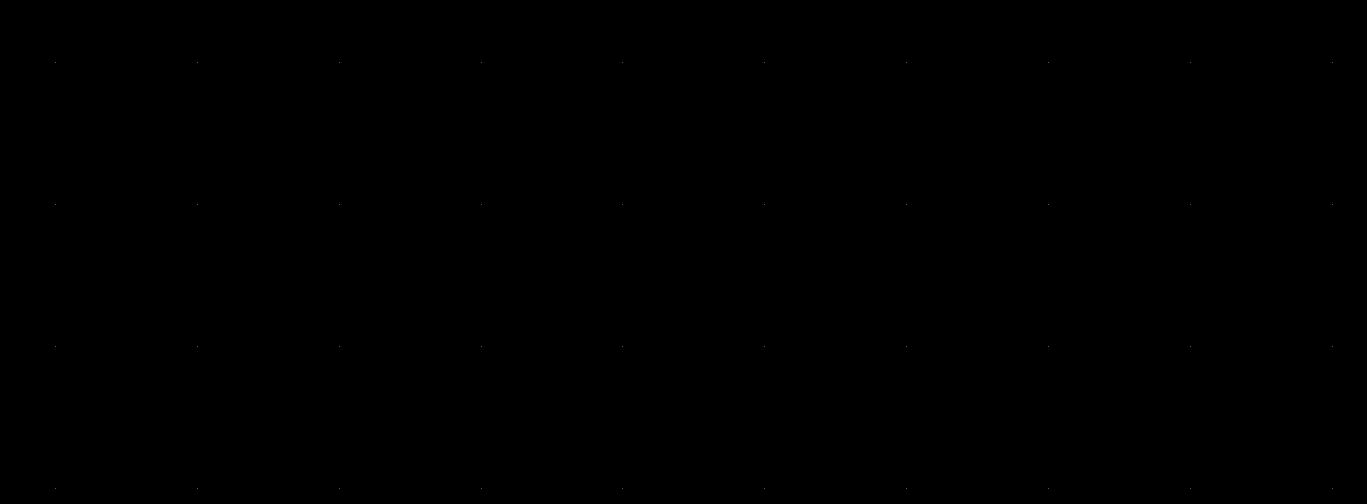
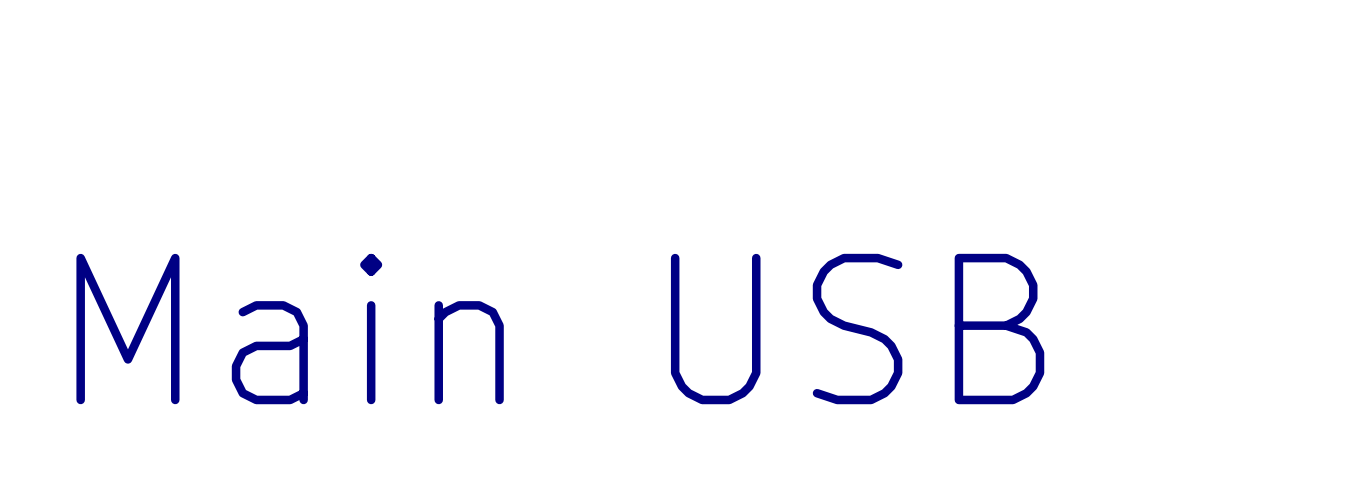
text: none -> Main USB (560, 329)

